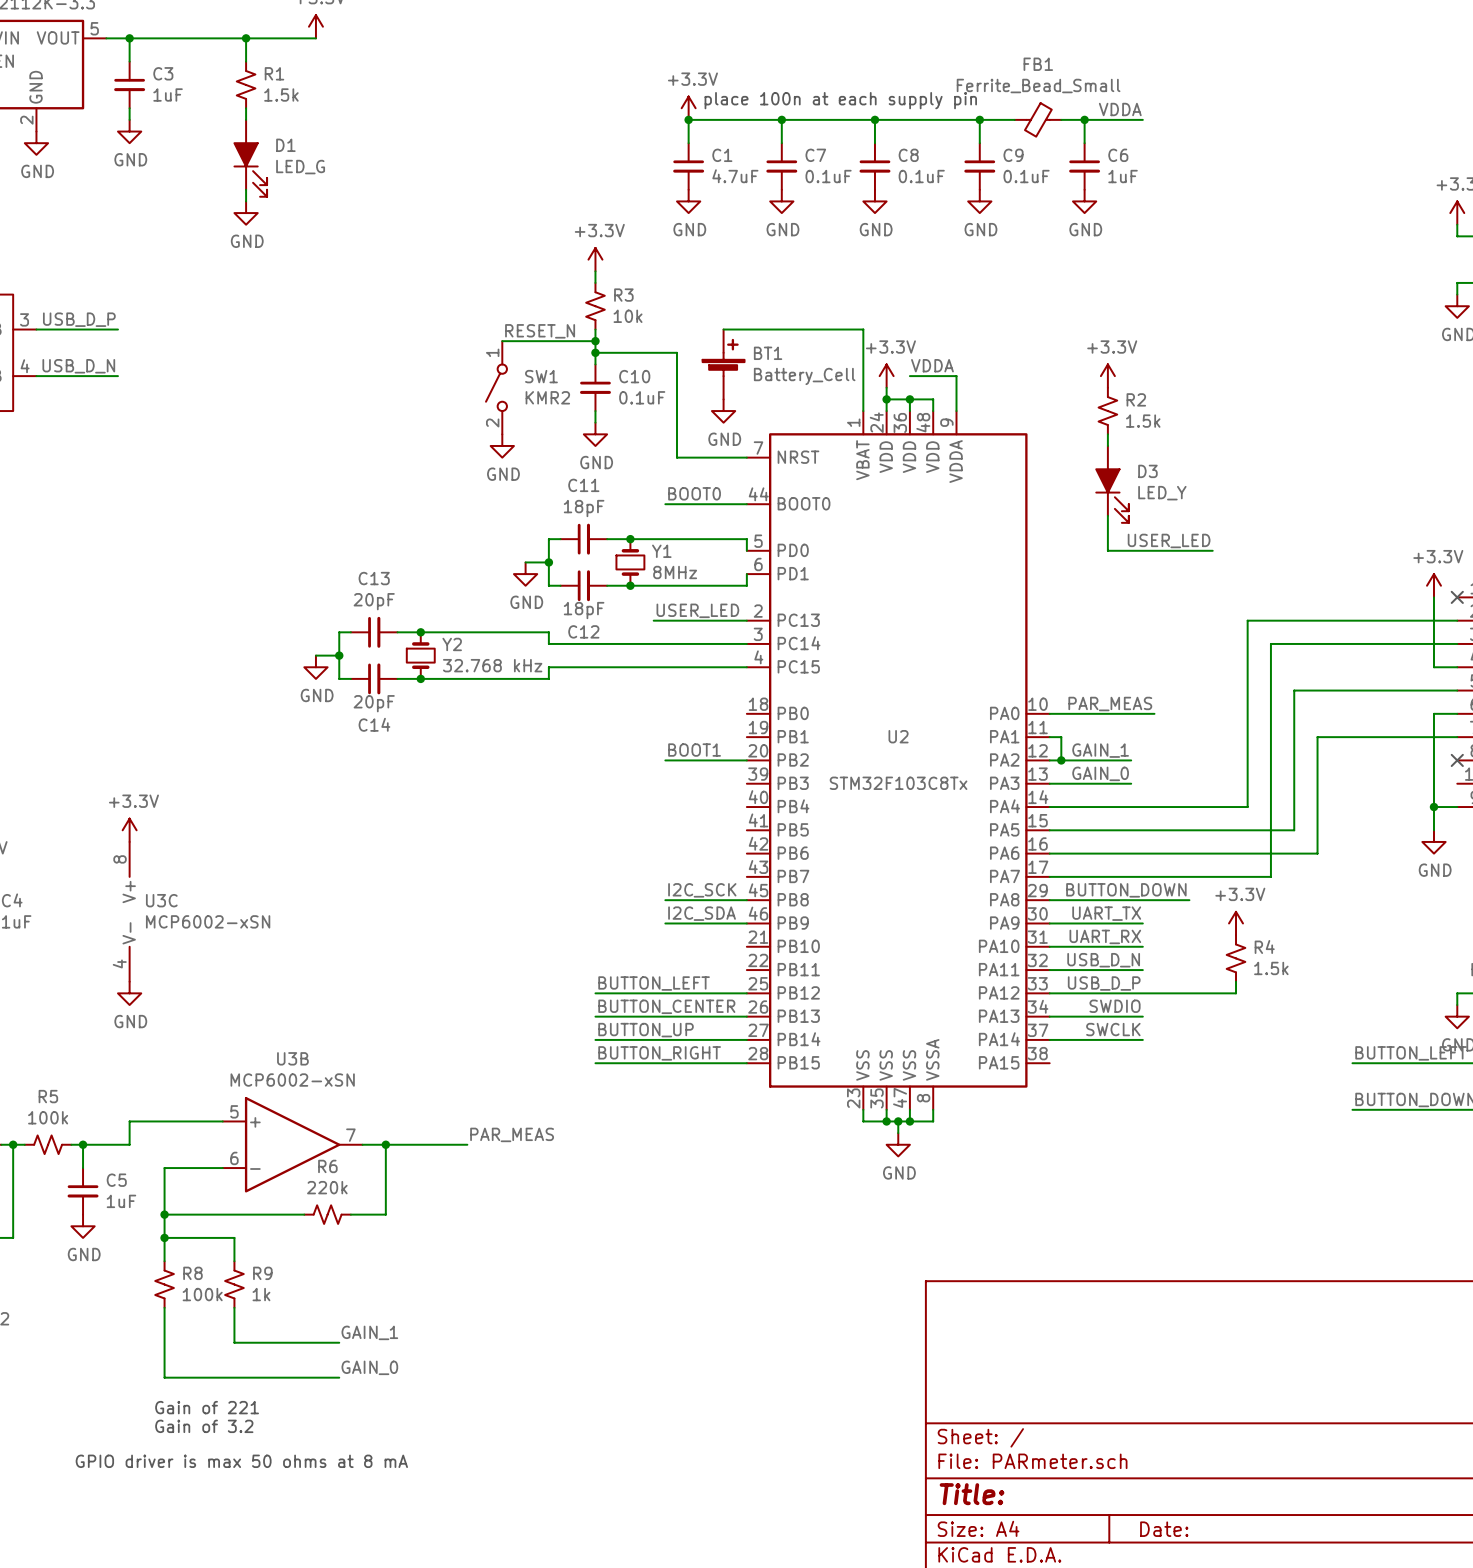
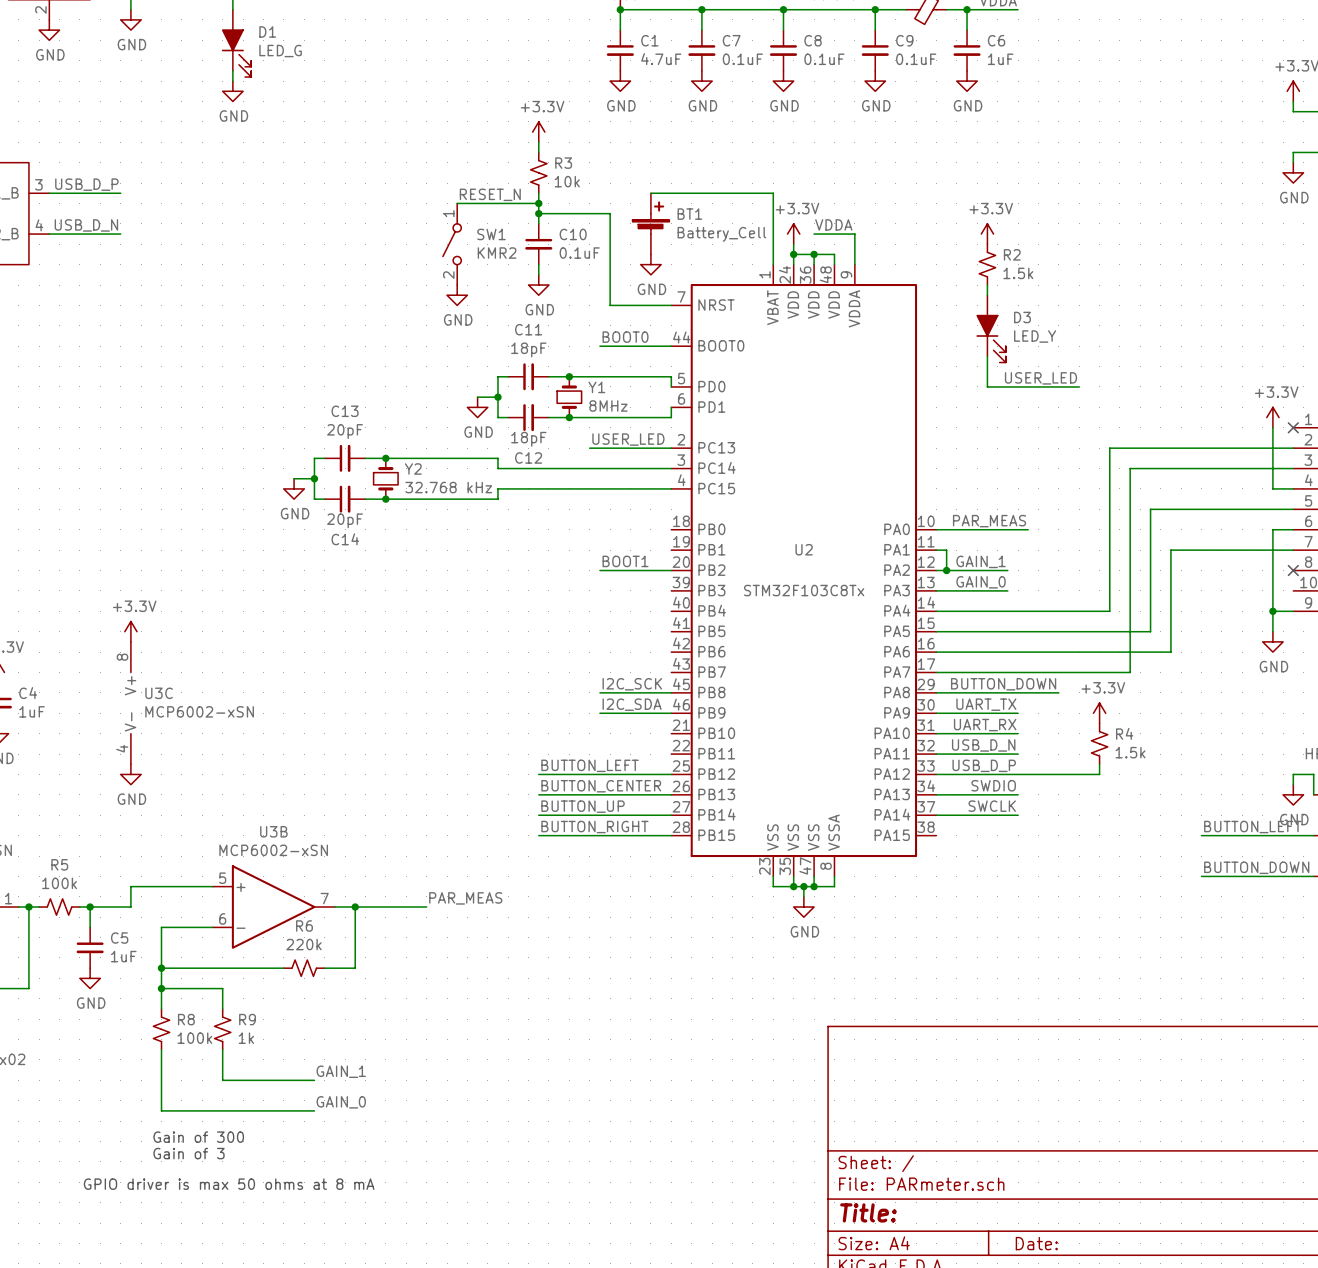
text: Gain of 221 (207, 1407) -> Gain of 300 (198, 1137)
text: Gain of 3.2 (204, 1426) -> Gain of 3 (189, 1153)

